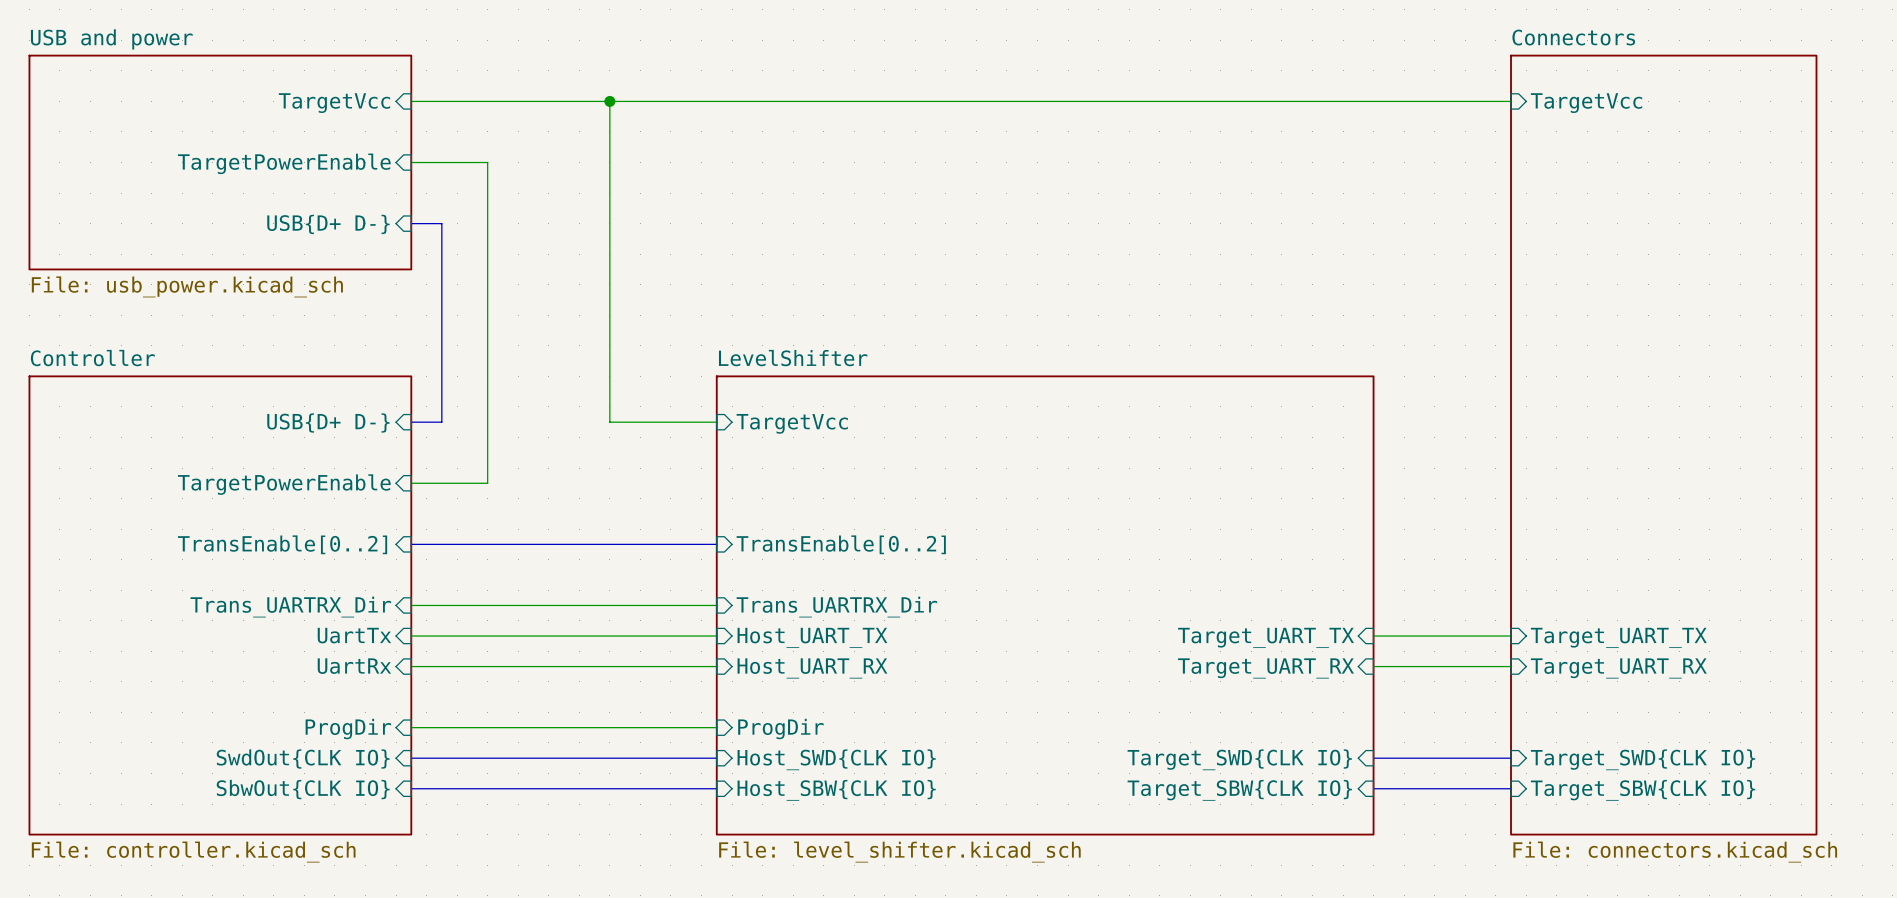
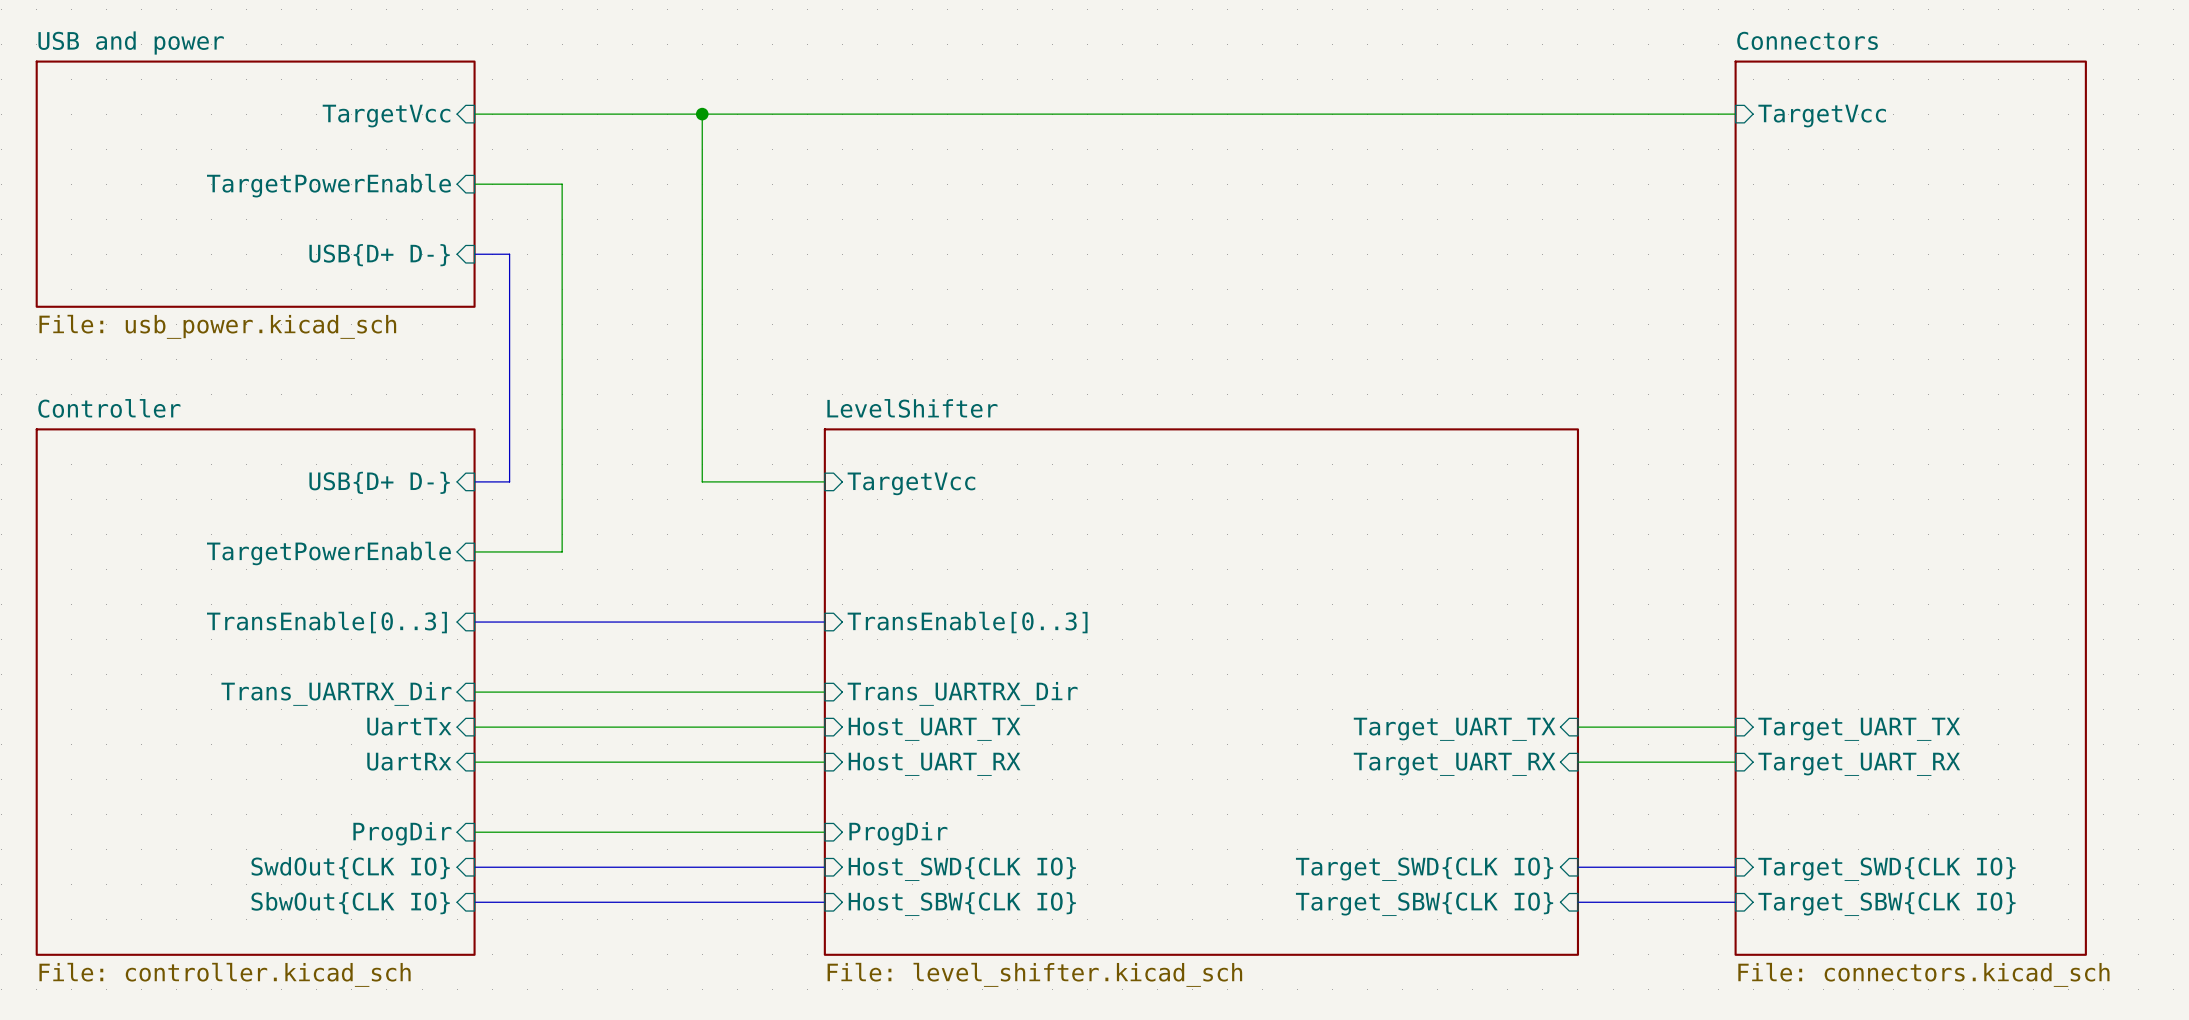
sheet pin: TransEnable[0..2] (282, 544) -> TransEnable[0..3] (326, 622)
sheet pin: TransEnable[0..2] (841, 544) -> TransEnable[0..3] (967, 622)

